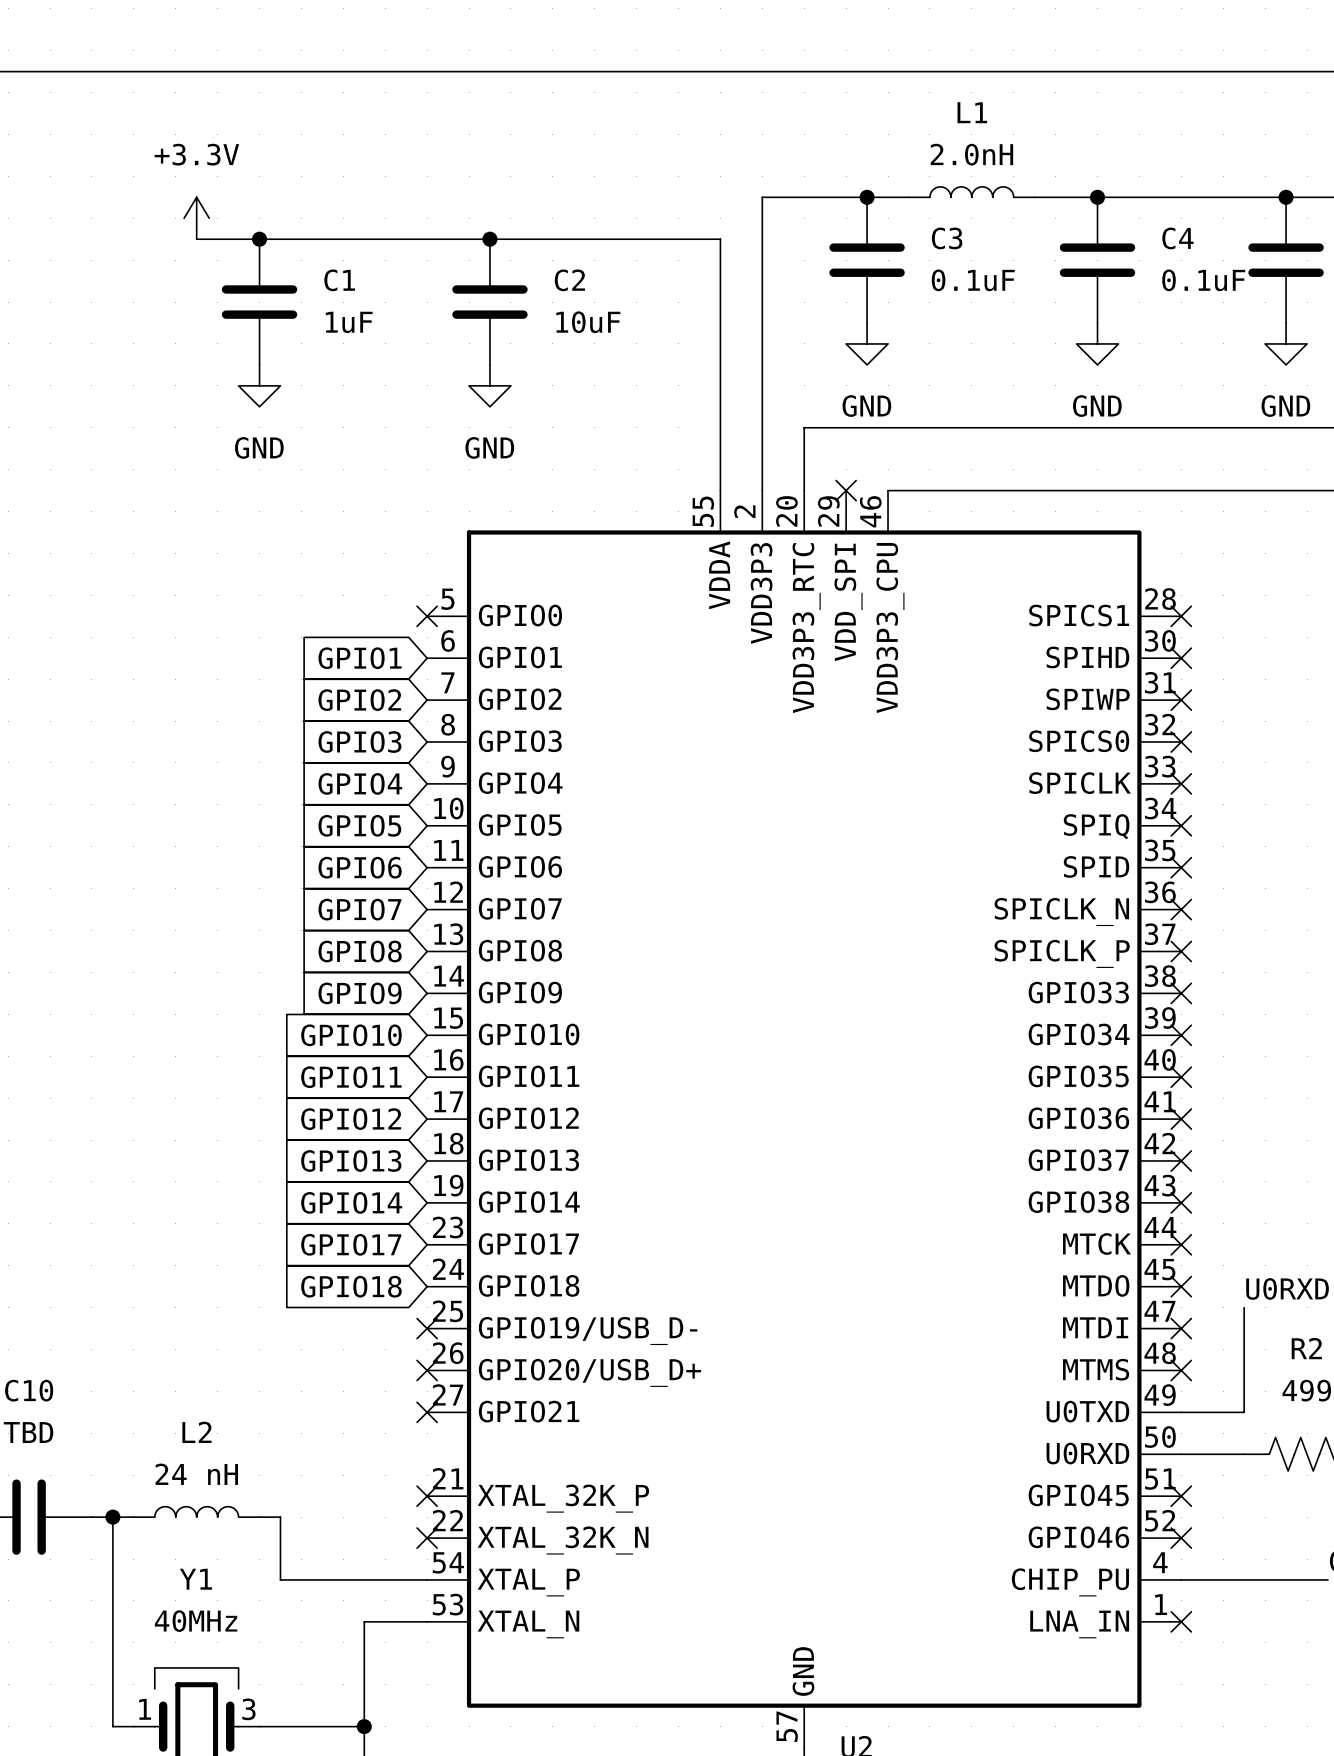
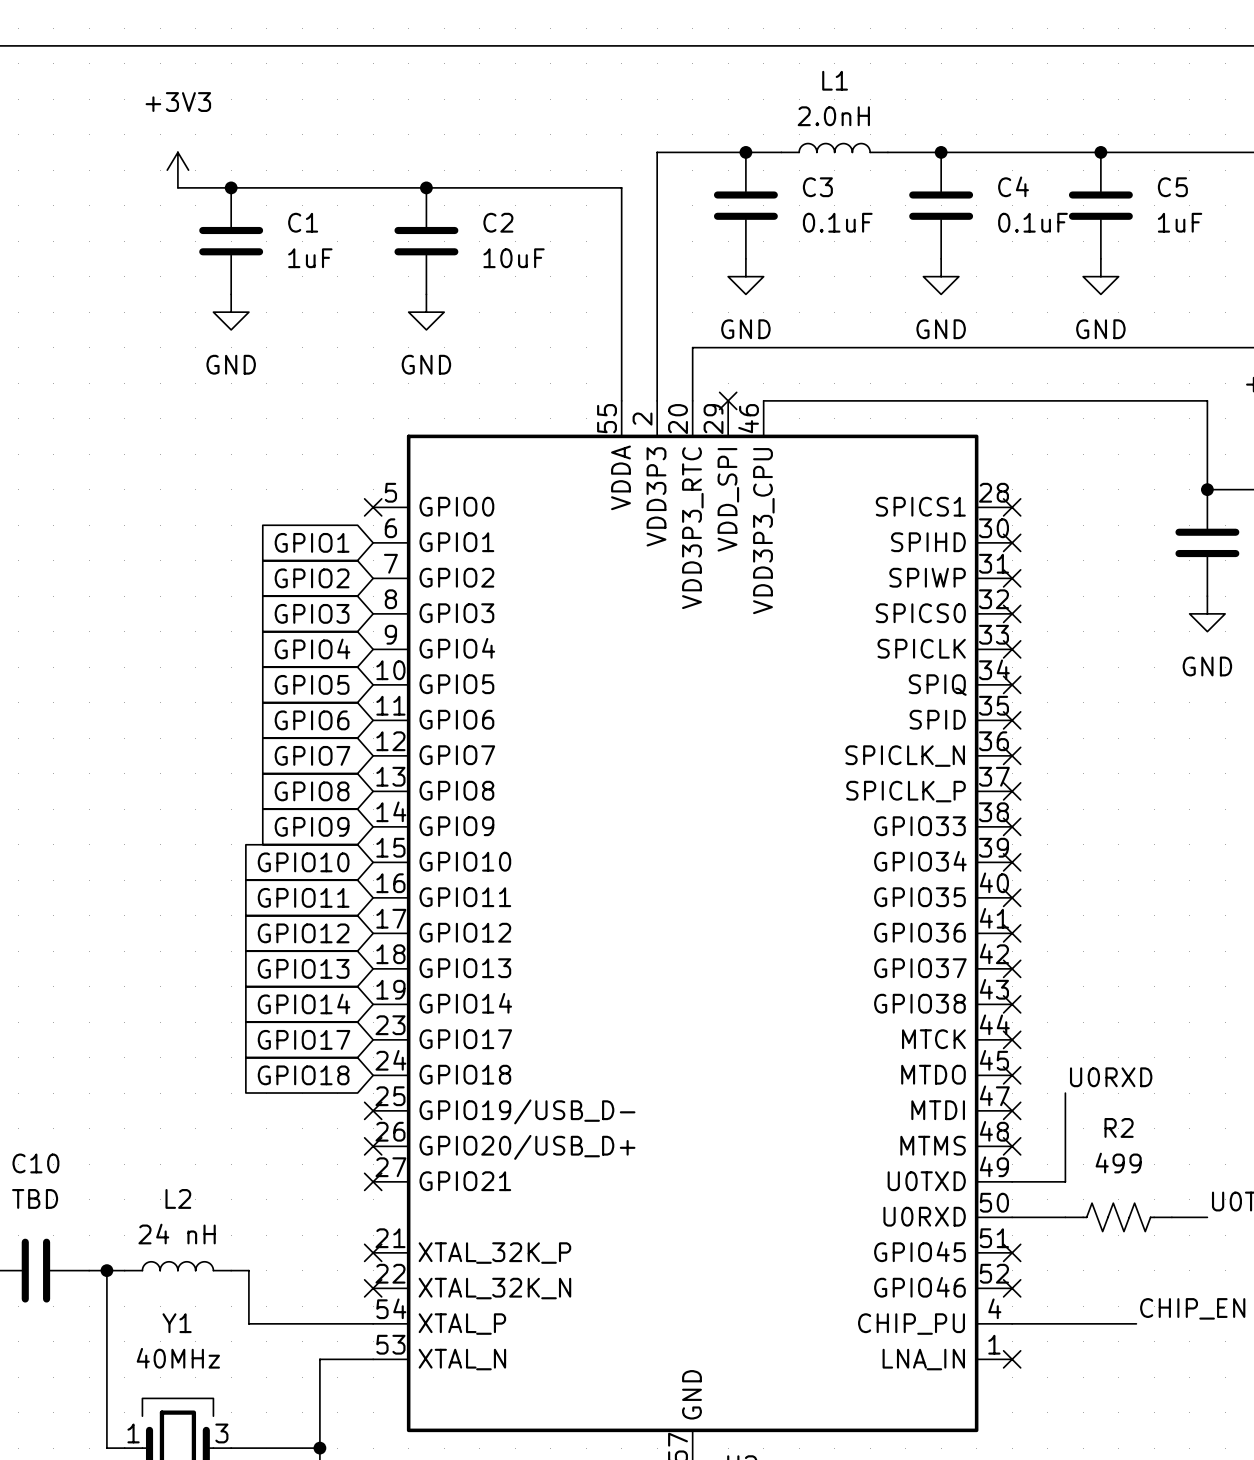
power symbol: +3.3V (196, 218) -> +3V3 (177, 170)

